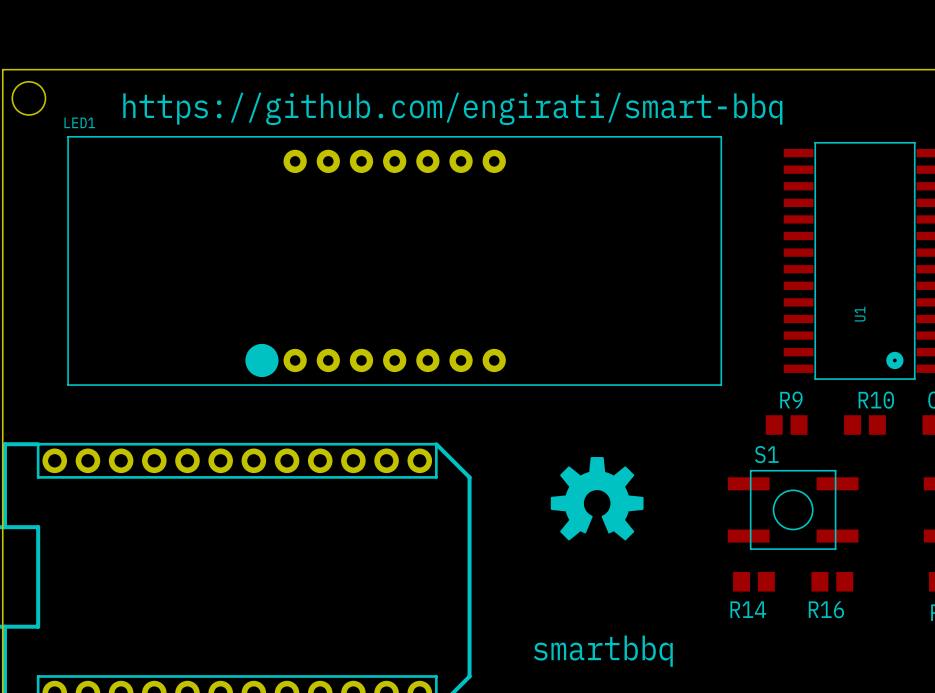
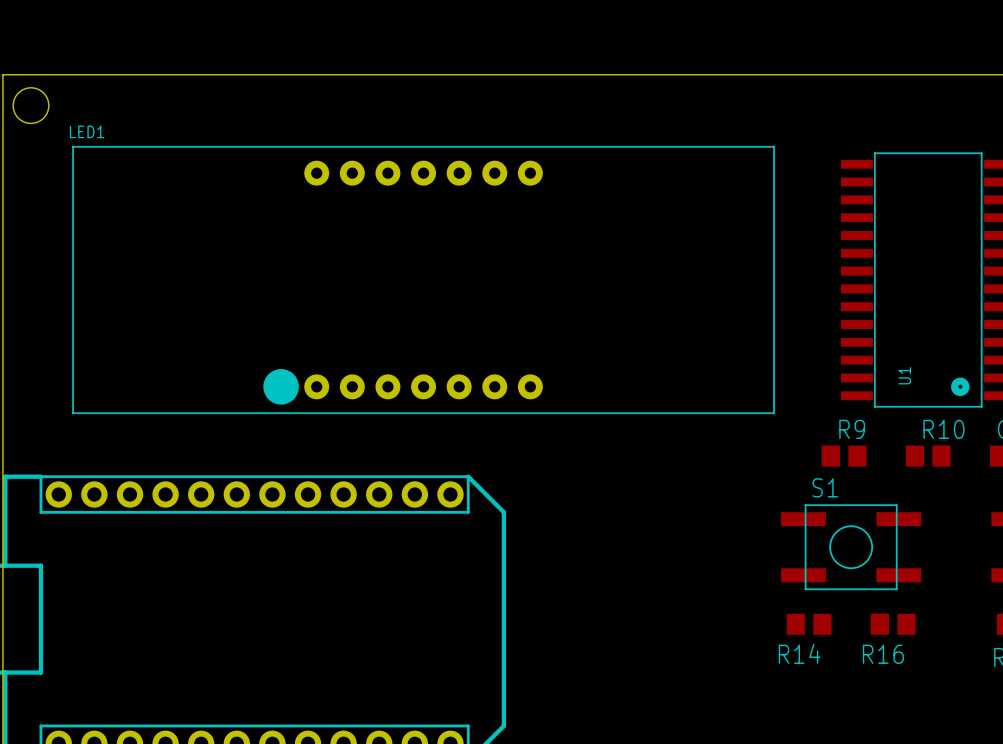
text: https://github.com/engirati/smart-bbq (452, 108) -> none
U1 name position: U1 (860, 314) -> U1 (904, 375)
drawing: [550, 457, 644, 541] -> none
text: smartbbq (603, 651) -> none

